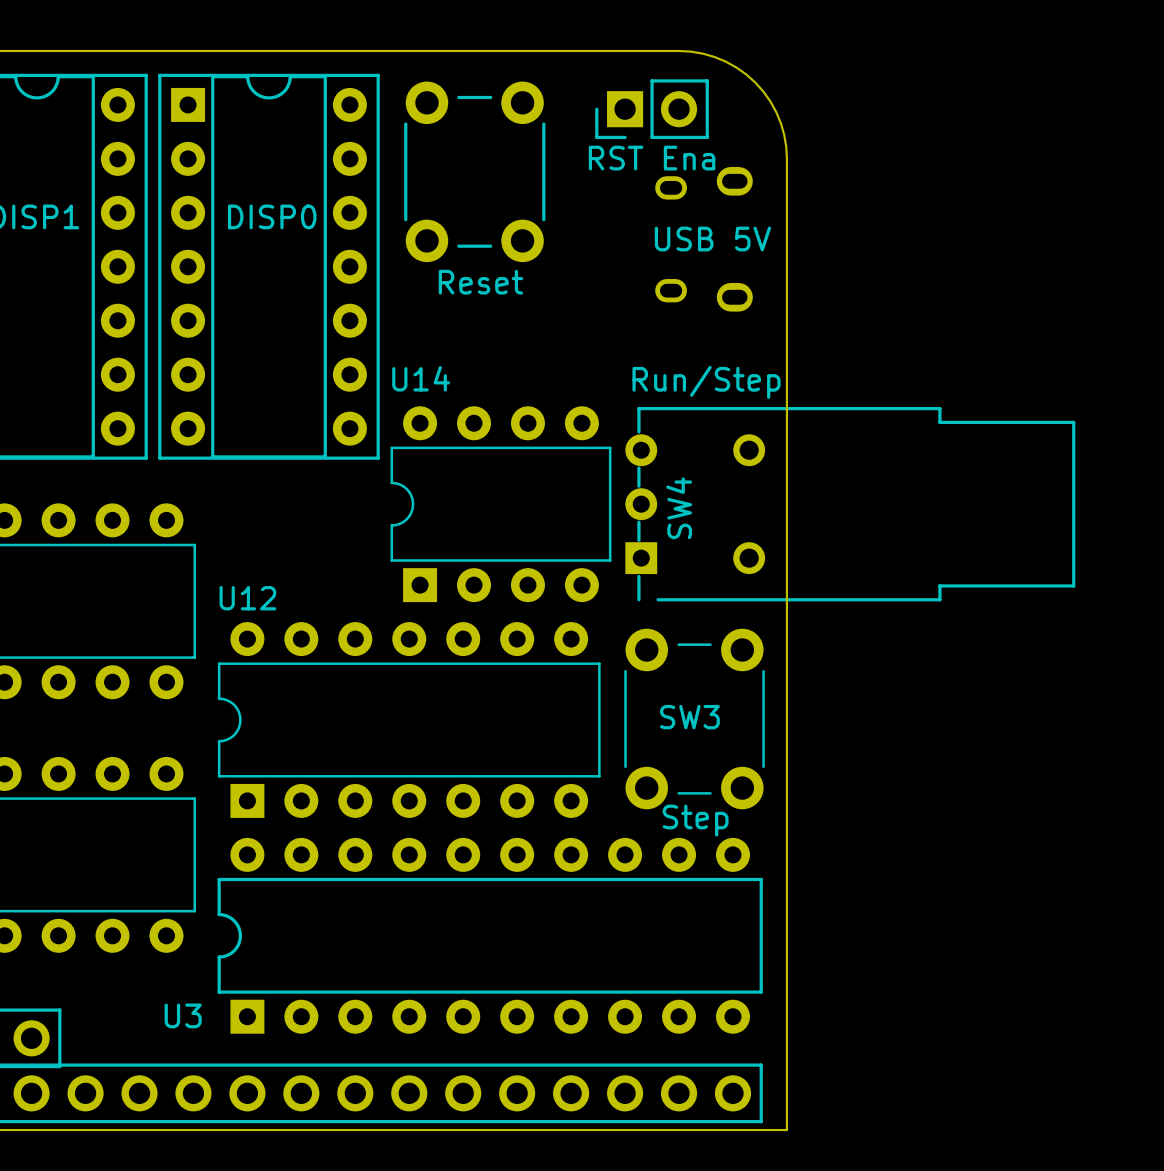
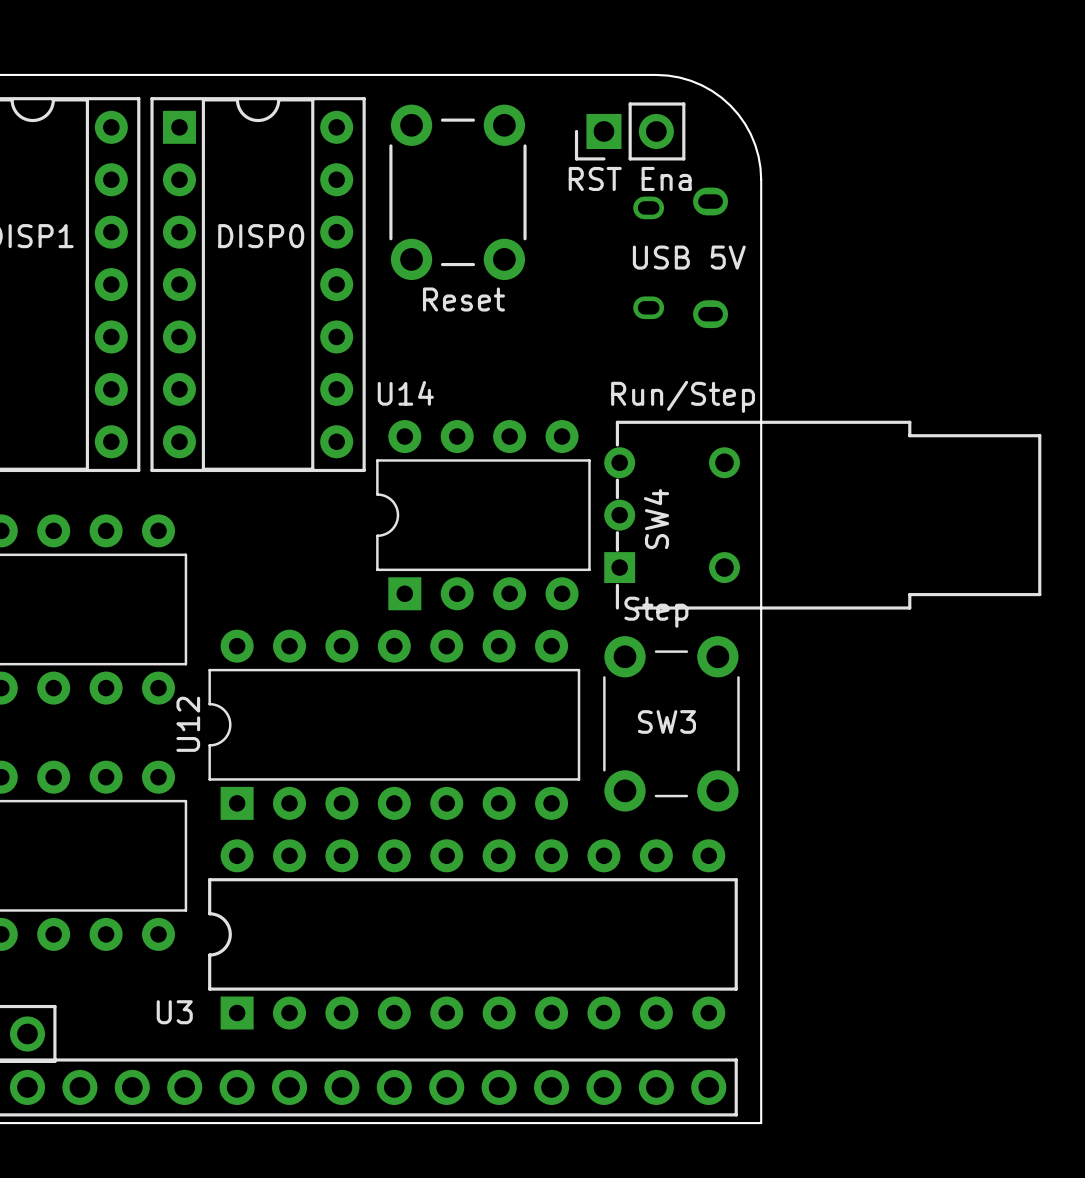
U12 name rotation: 0° (247, 598) -> 90° counterclockwise (188, 724)
U12 name position: U12 (247, 598) -> U12 (188, 724)
text position: Step (695, 820) -> Step (656, 612)

